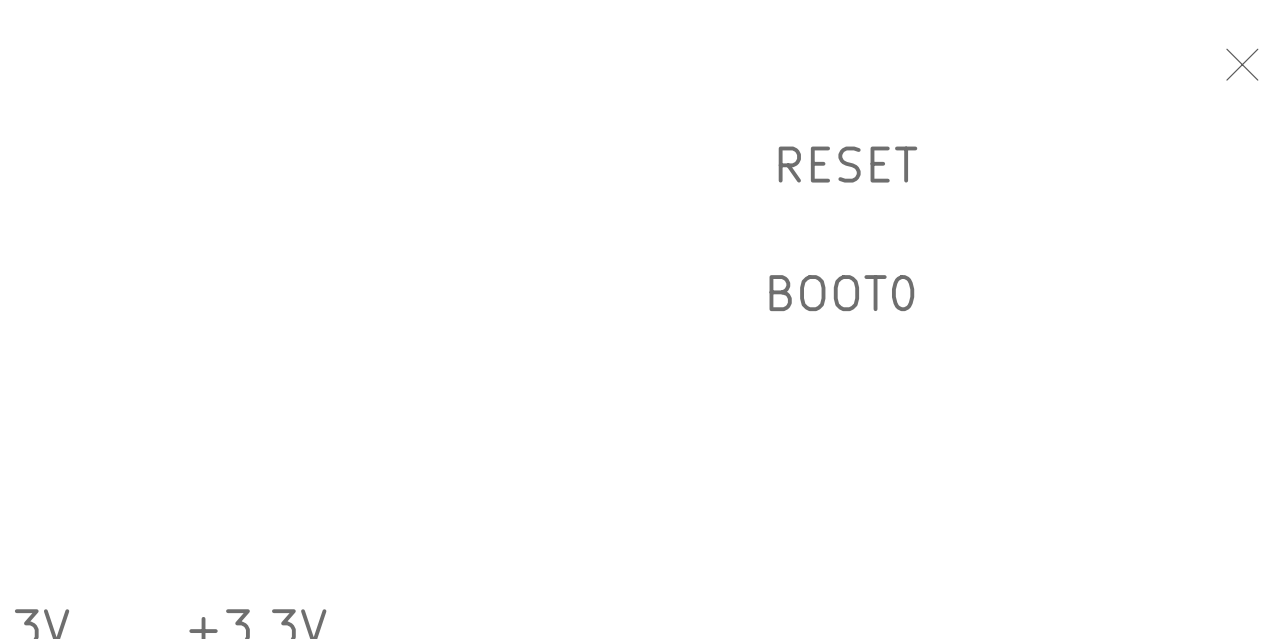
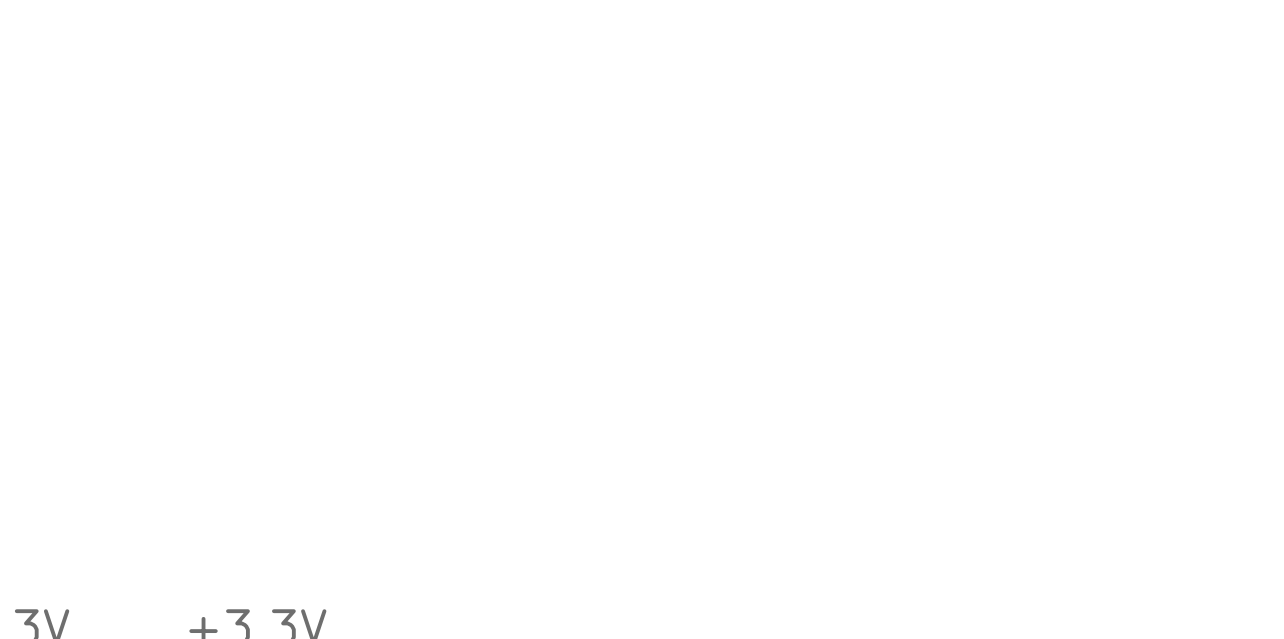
no-connect mark: (1242, 64) -> none
label: RESET (847, 164) -> none
label: BOOT0 (841, 293) -> none

